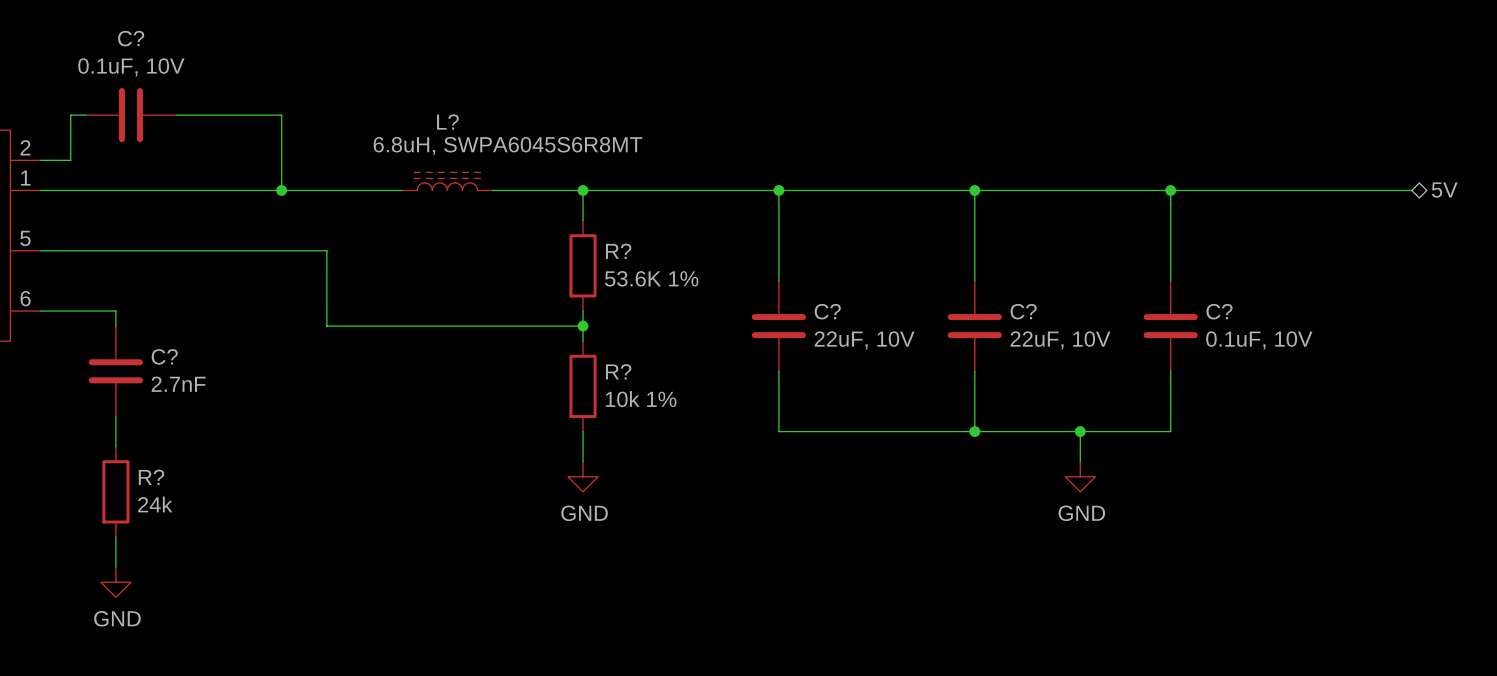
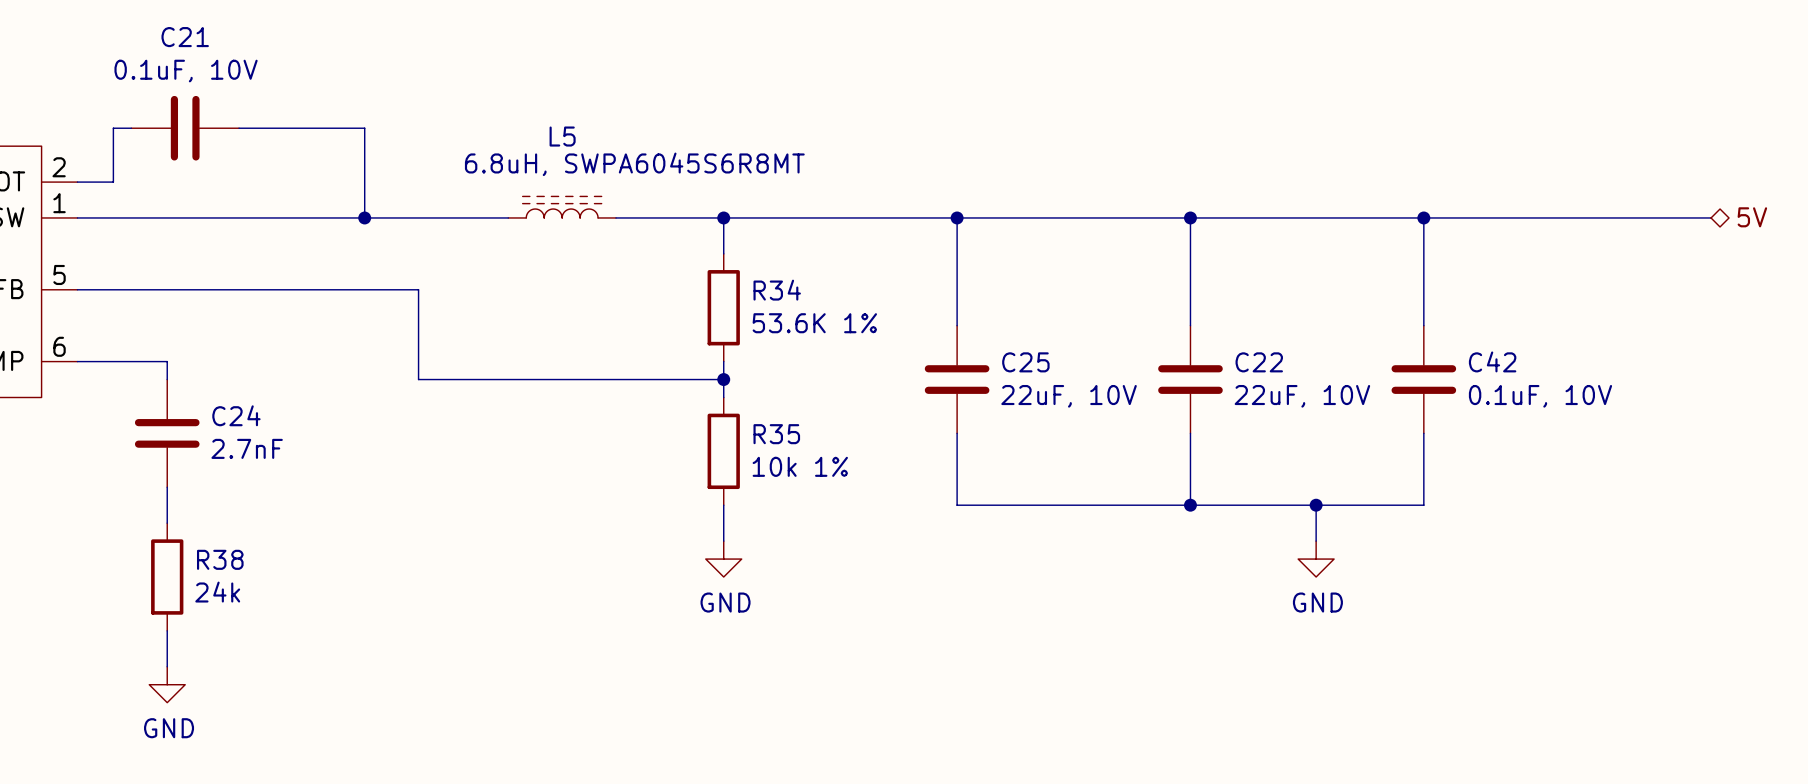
C? name: C? (131, 38) -> C21 (185, 37)
L? name: L? (447, 122) -> L5 (562, 136)
R? name: R? (618, 251) -> R34 (777, 290)
C? name: C? (827, 311) -> C25 (1025, 362)
C? name: C? (1023, 311) -> C22 (1259, 362)
C? name: C? (1219, 311) -> C42 (1492, 361)
C? name: C? (164, 356) -> C24 (236, 415)
R? name: R? (618, 371) -> R35 (776, 434)
R? name: R? (151, 477) -> R38 (220, 559)

